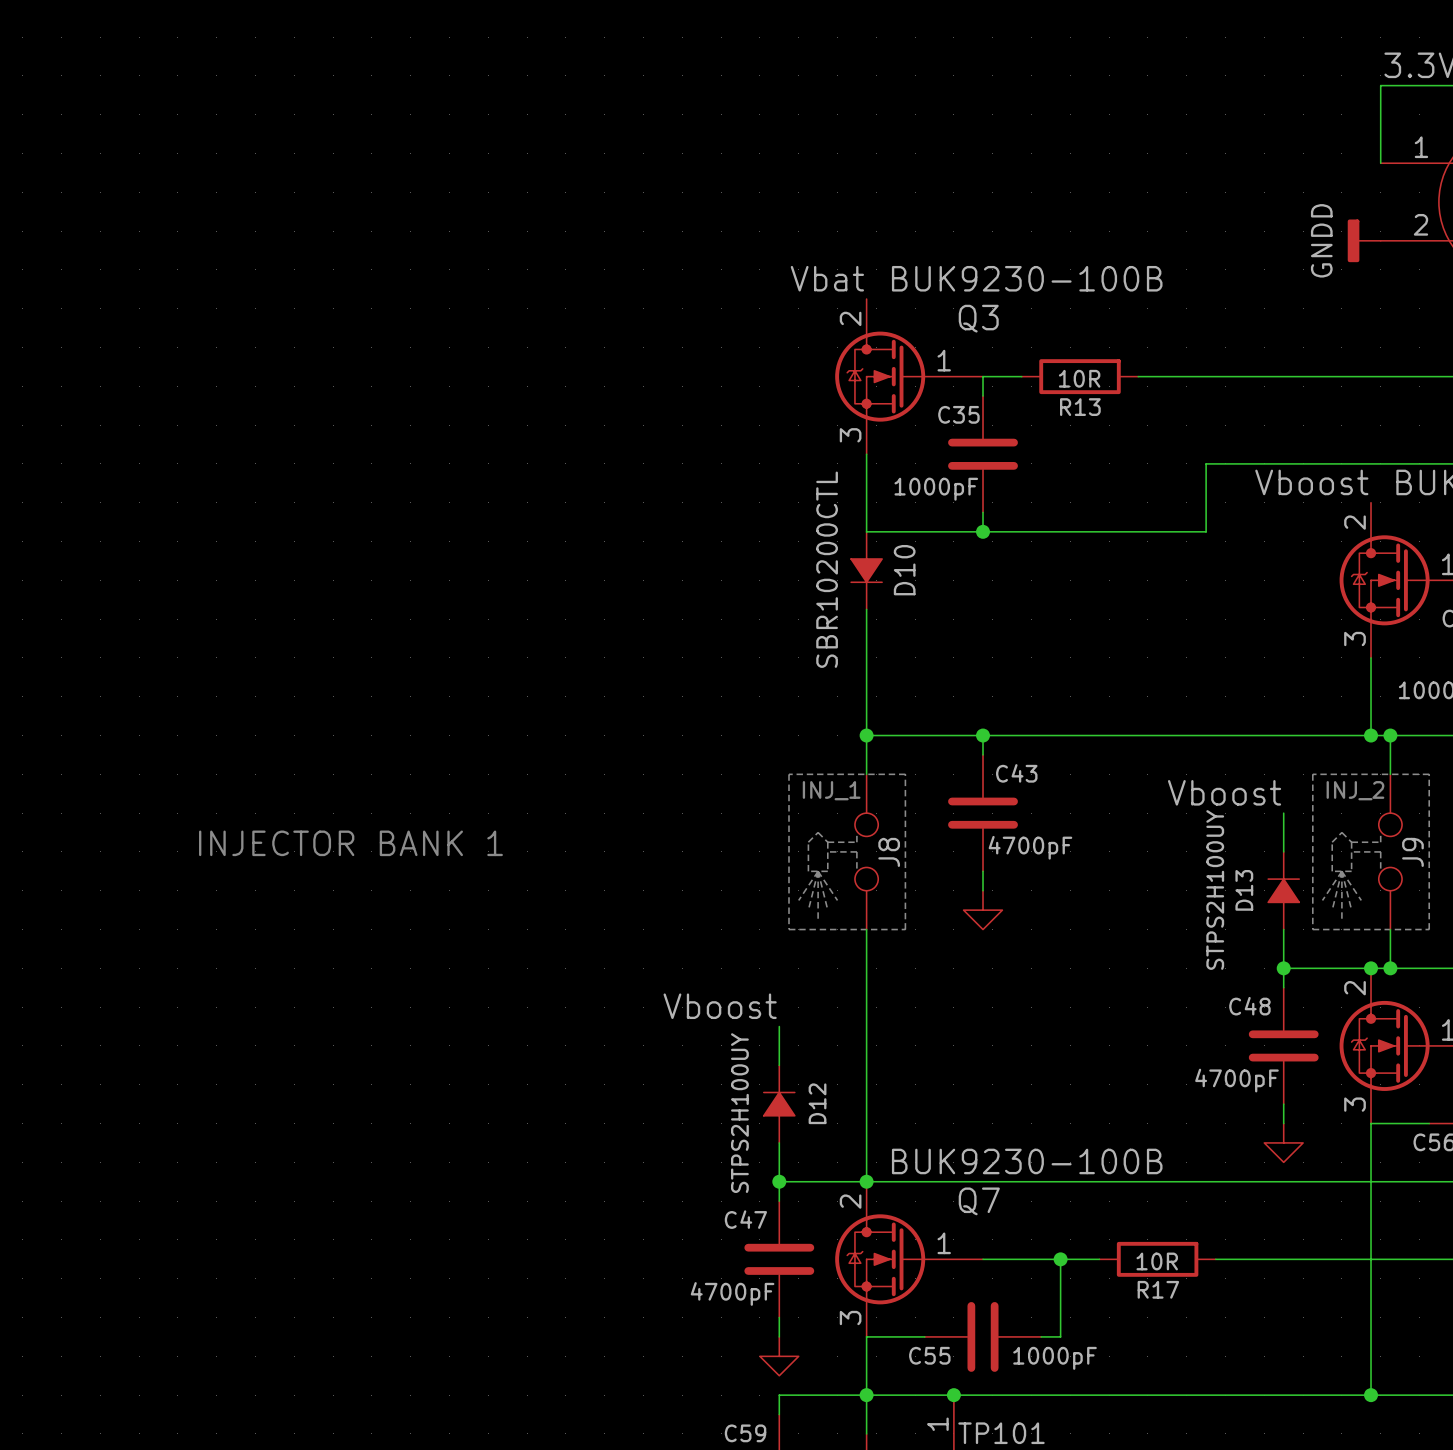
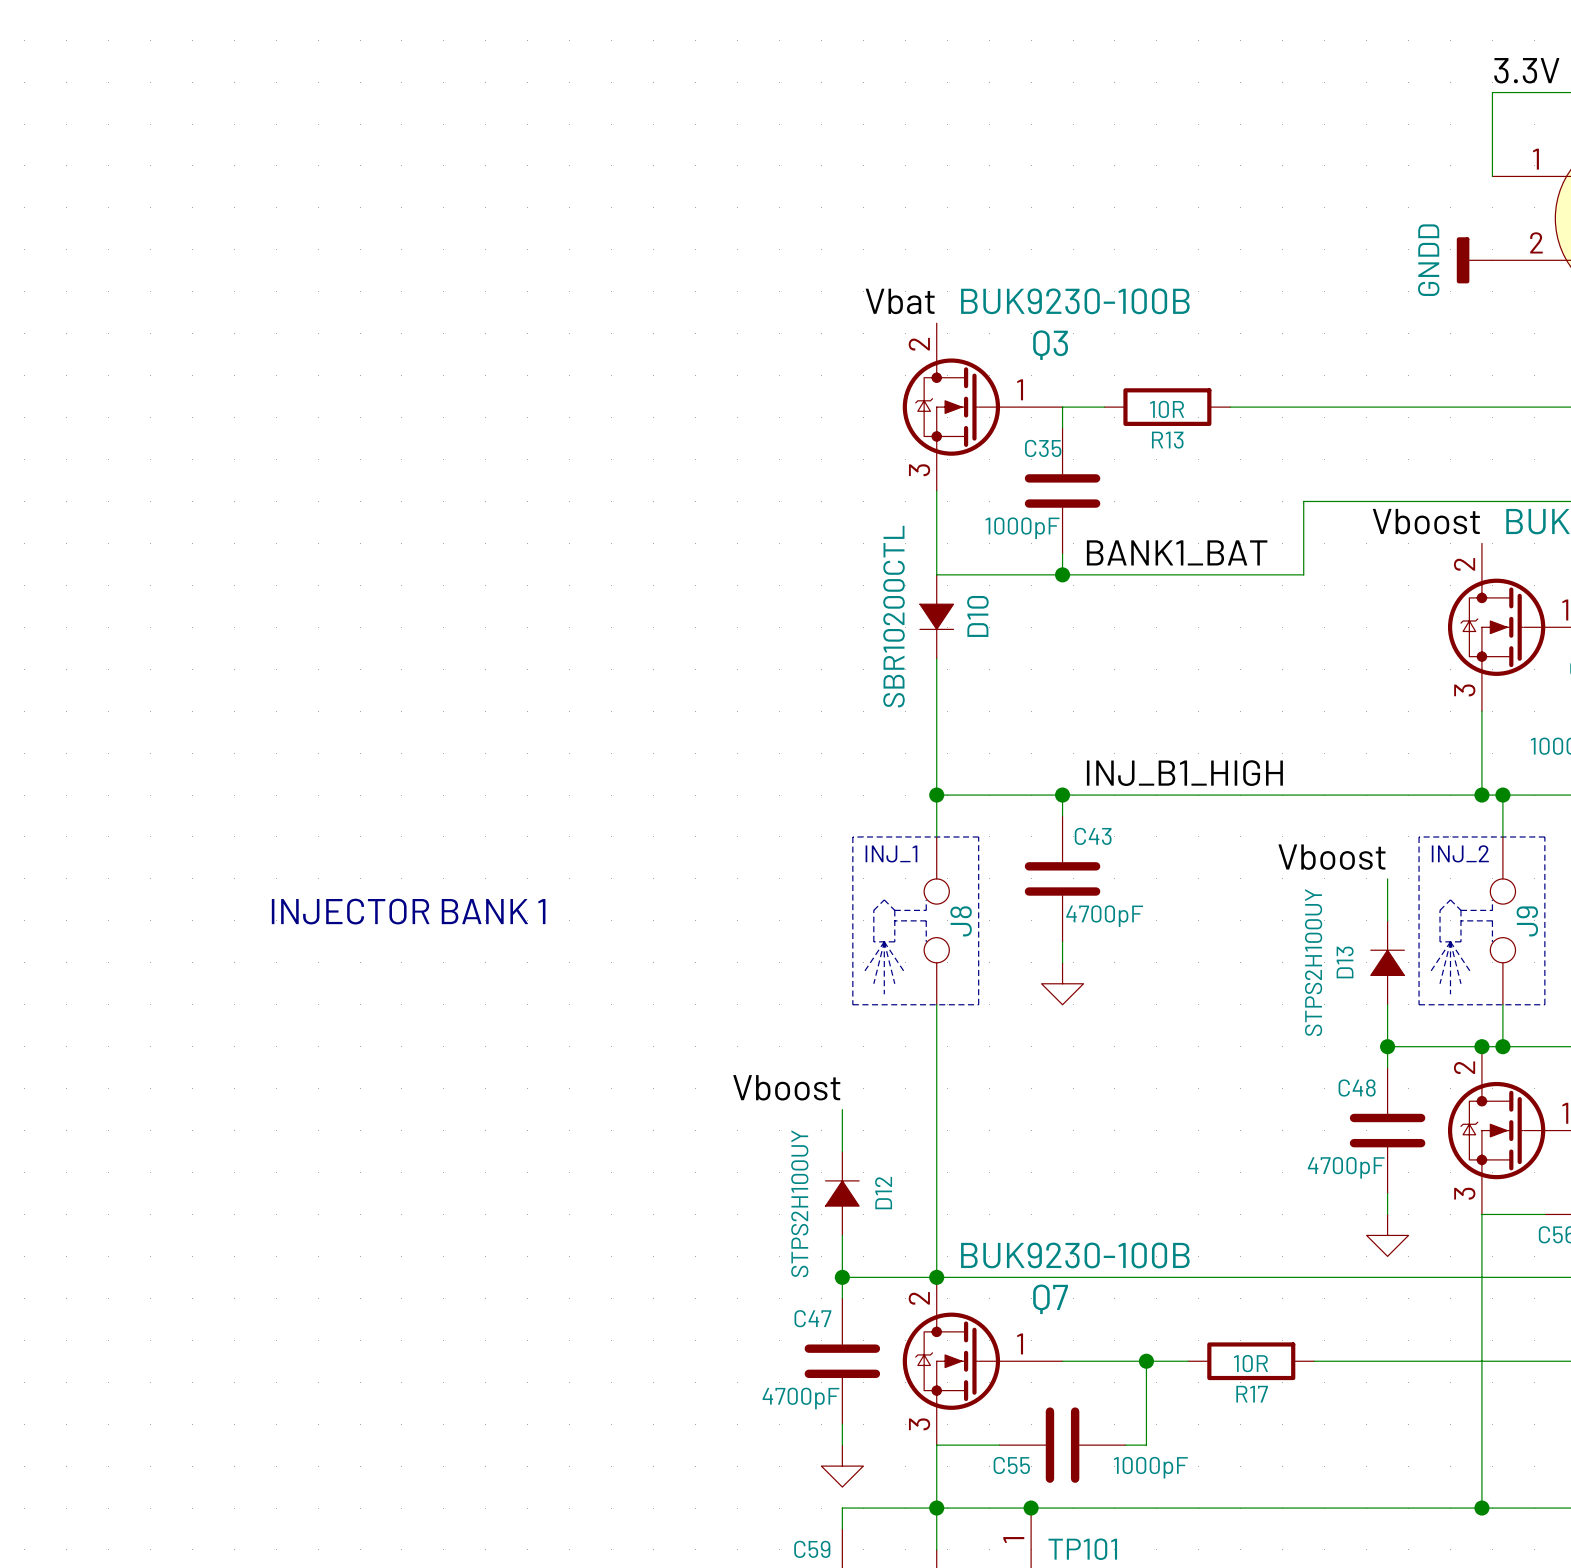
label: none -> BANK1_BAT (1177, 552)
label: none -> INJ_B1_HIGH (1184, 773)

